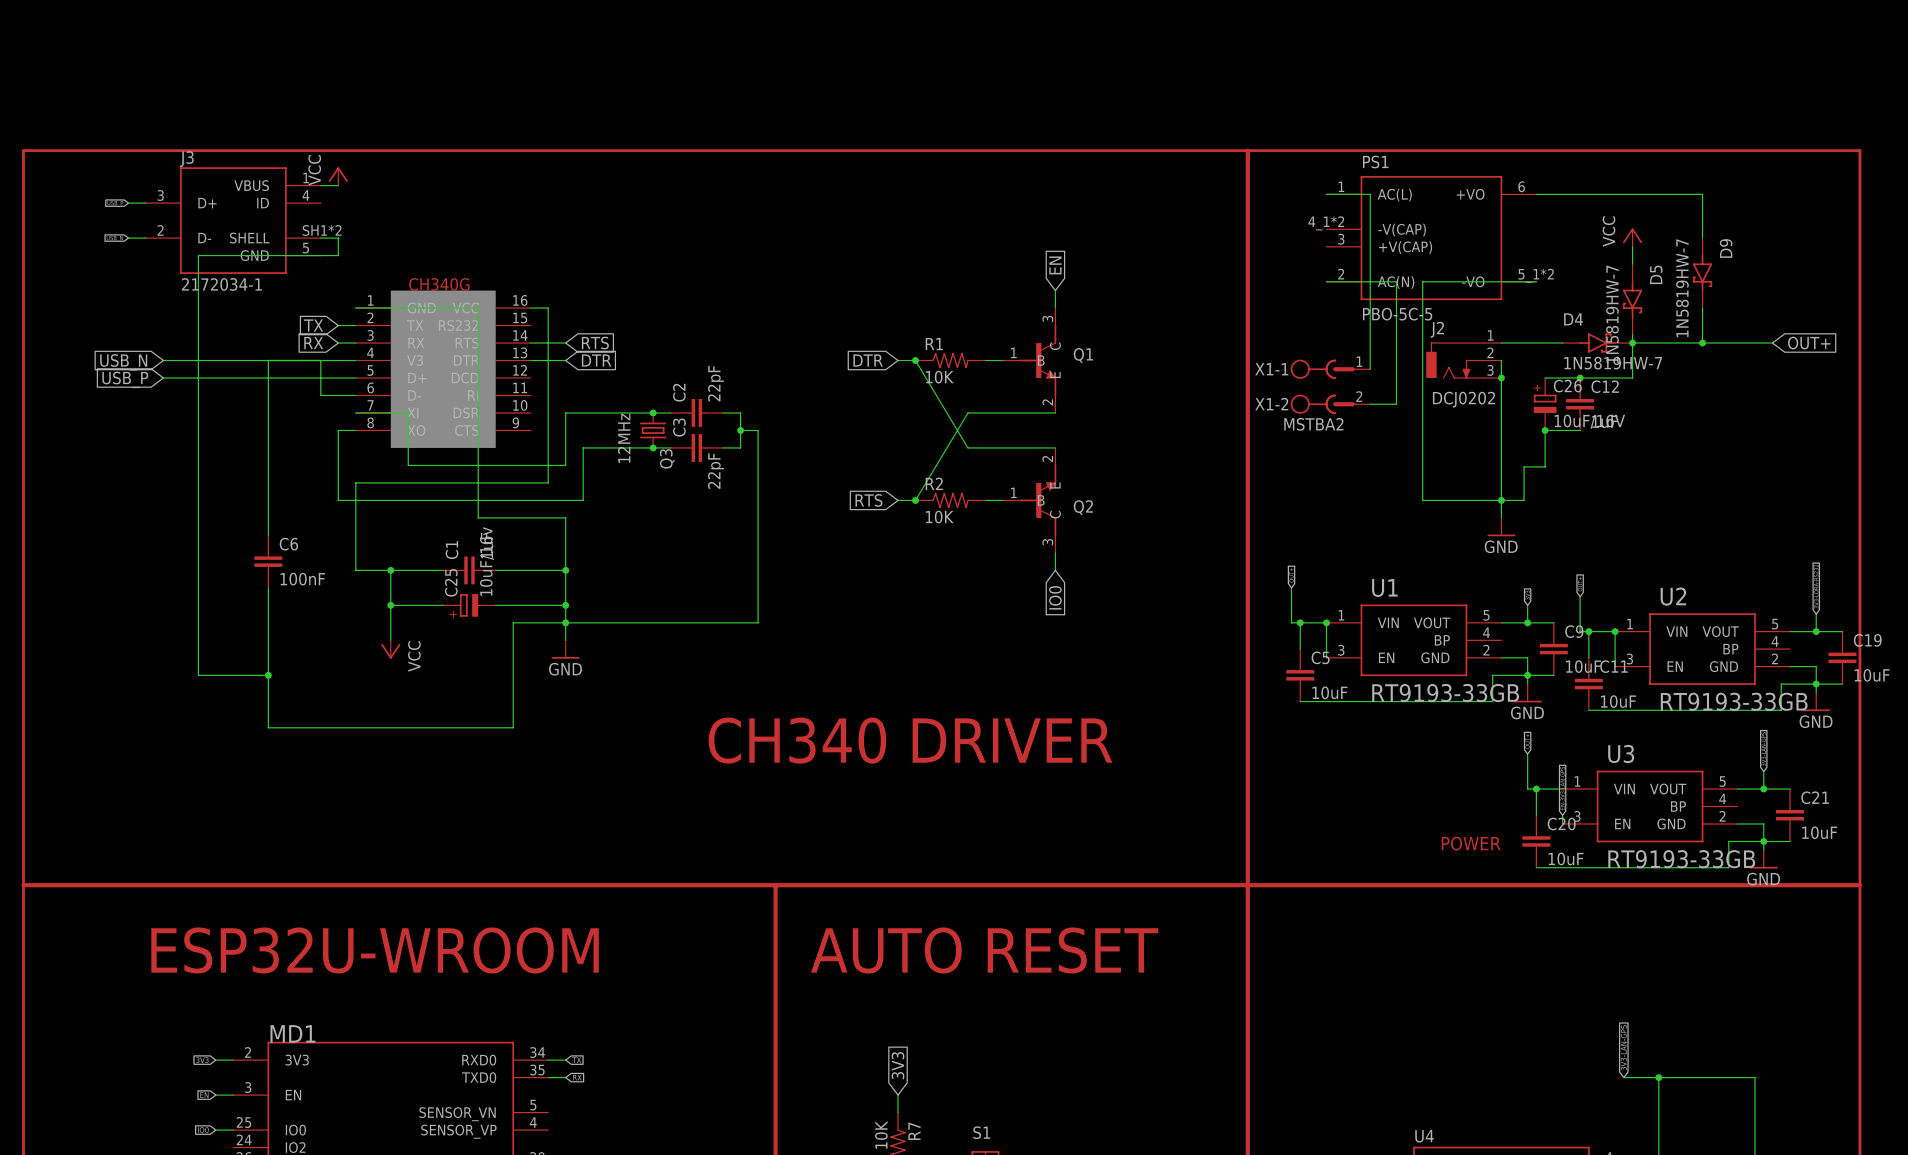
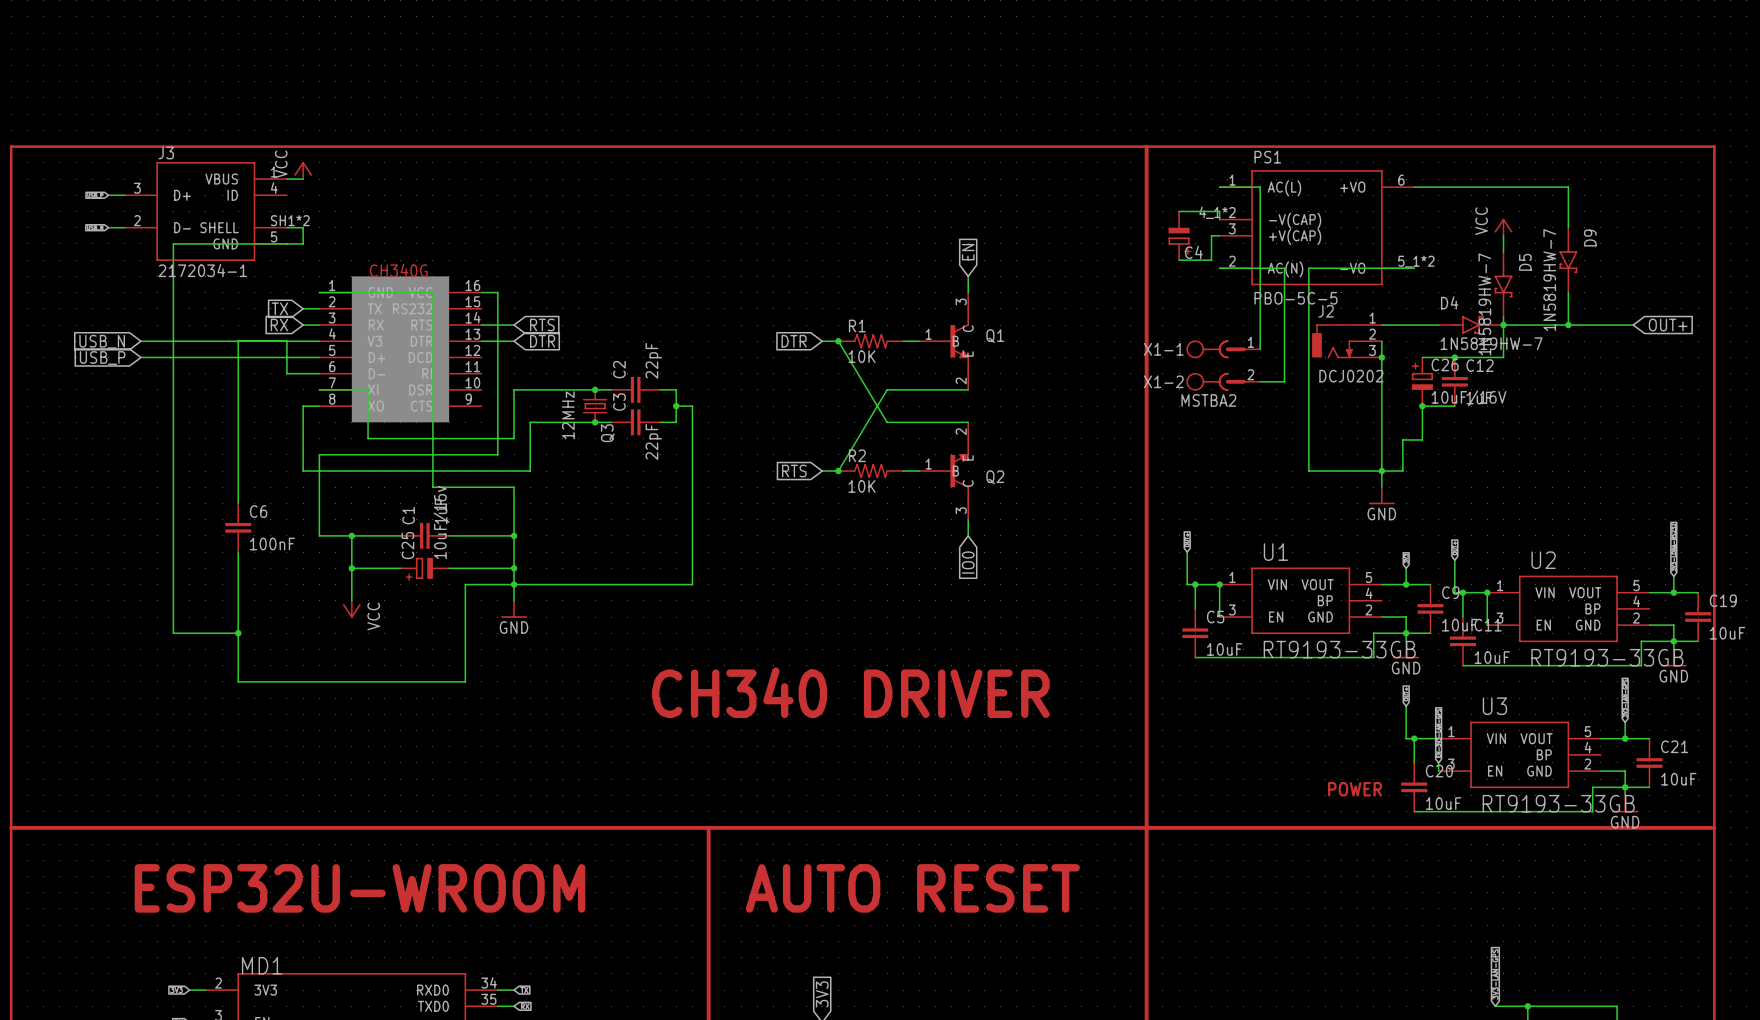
wire: none -> (1179, 211) (1219, 211) (1219, 219)
C4: none -> (1179, 235)
wire: none -> (1219, 235) (1211, 235) (1211, 260) (1179, 260)

